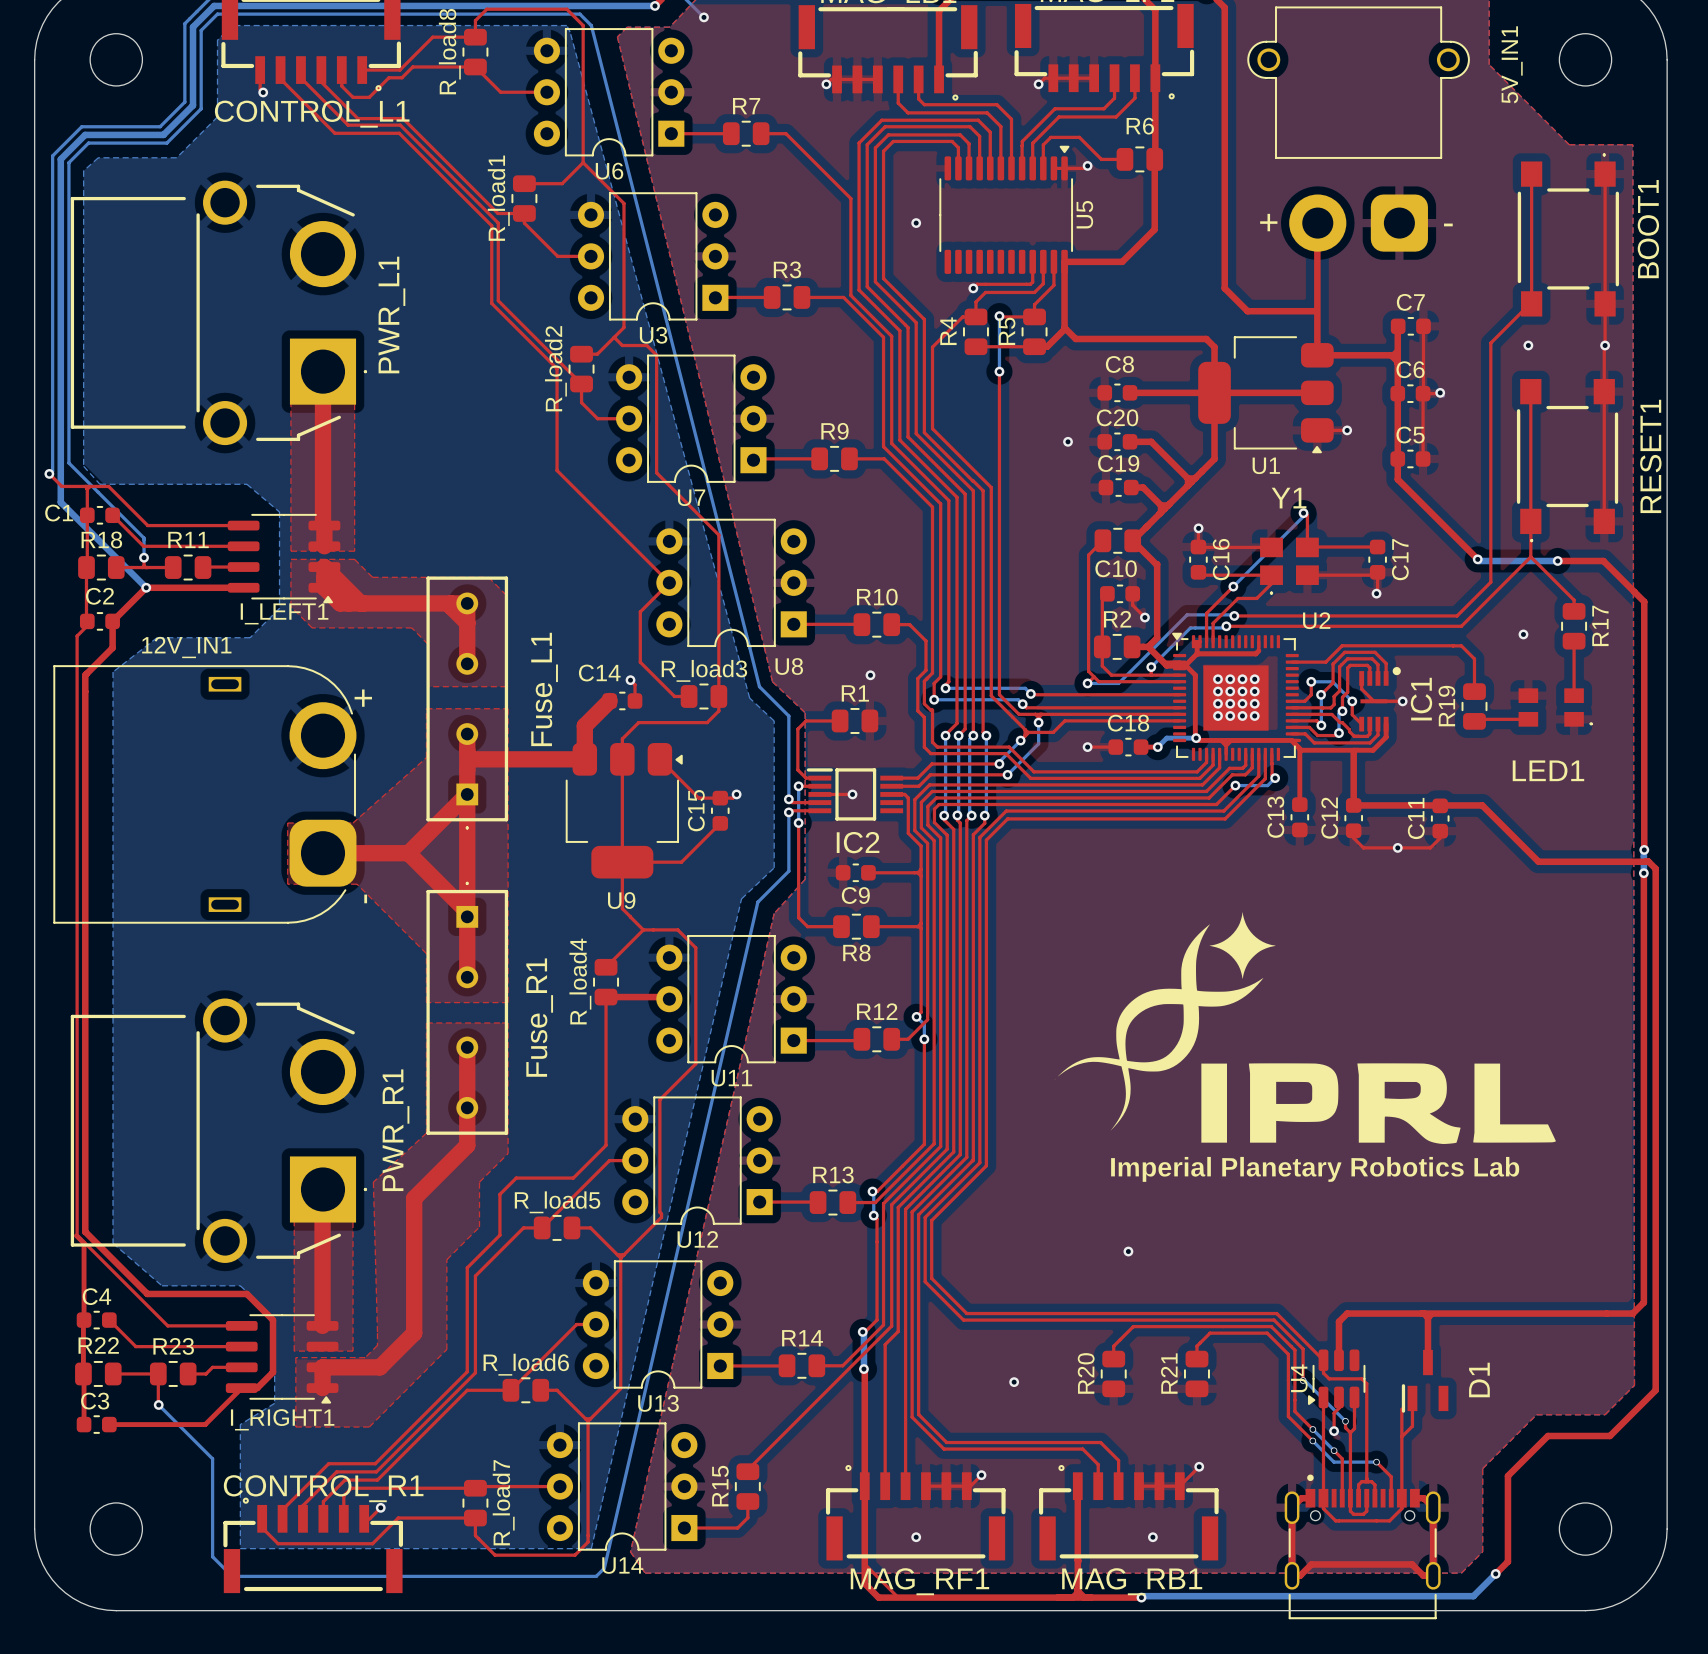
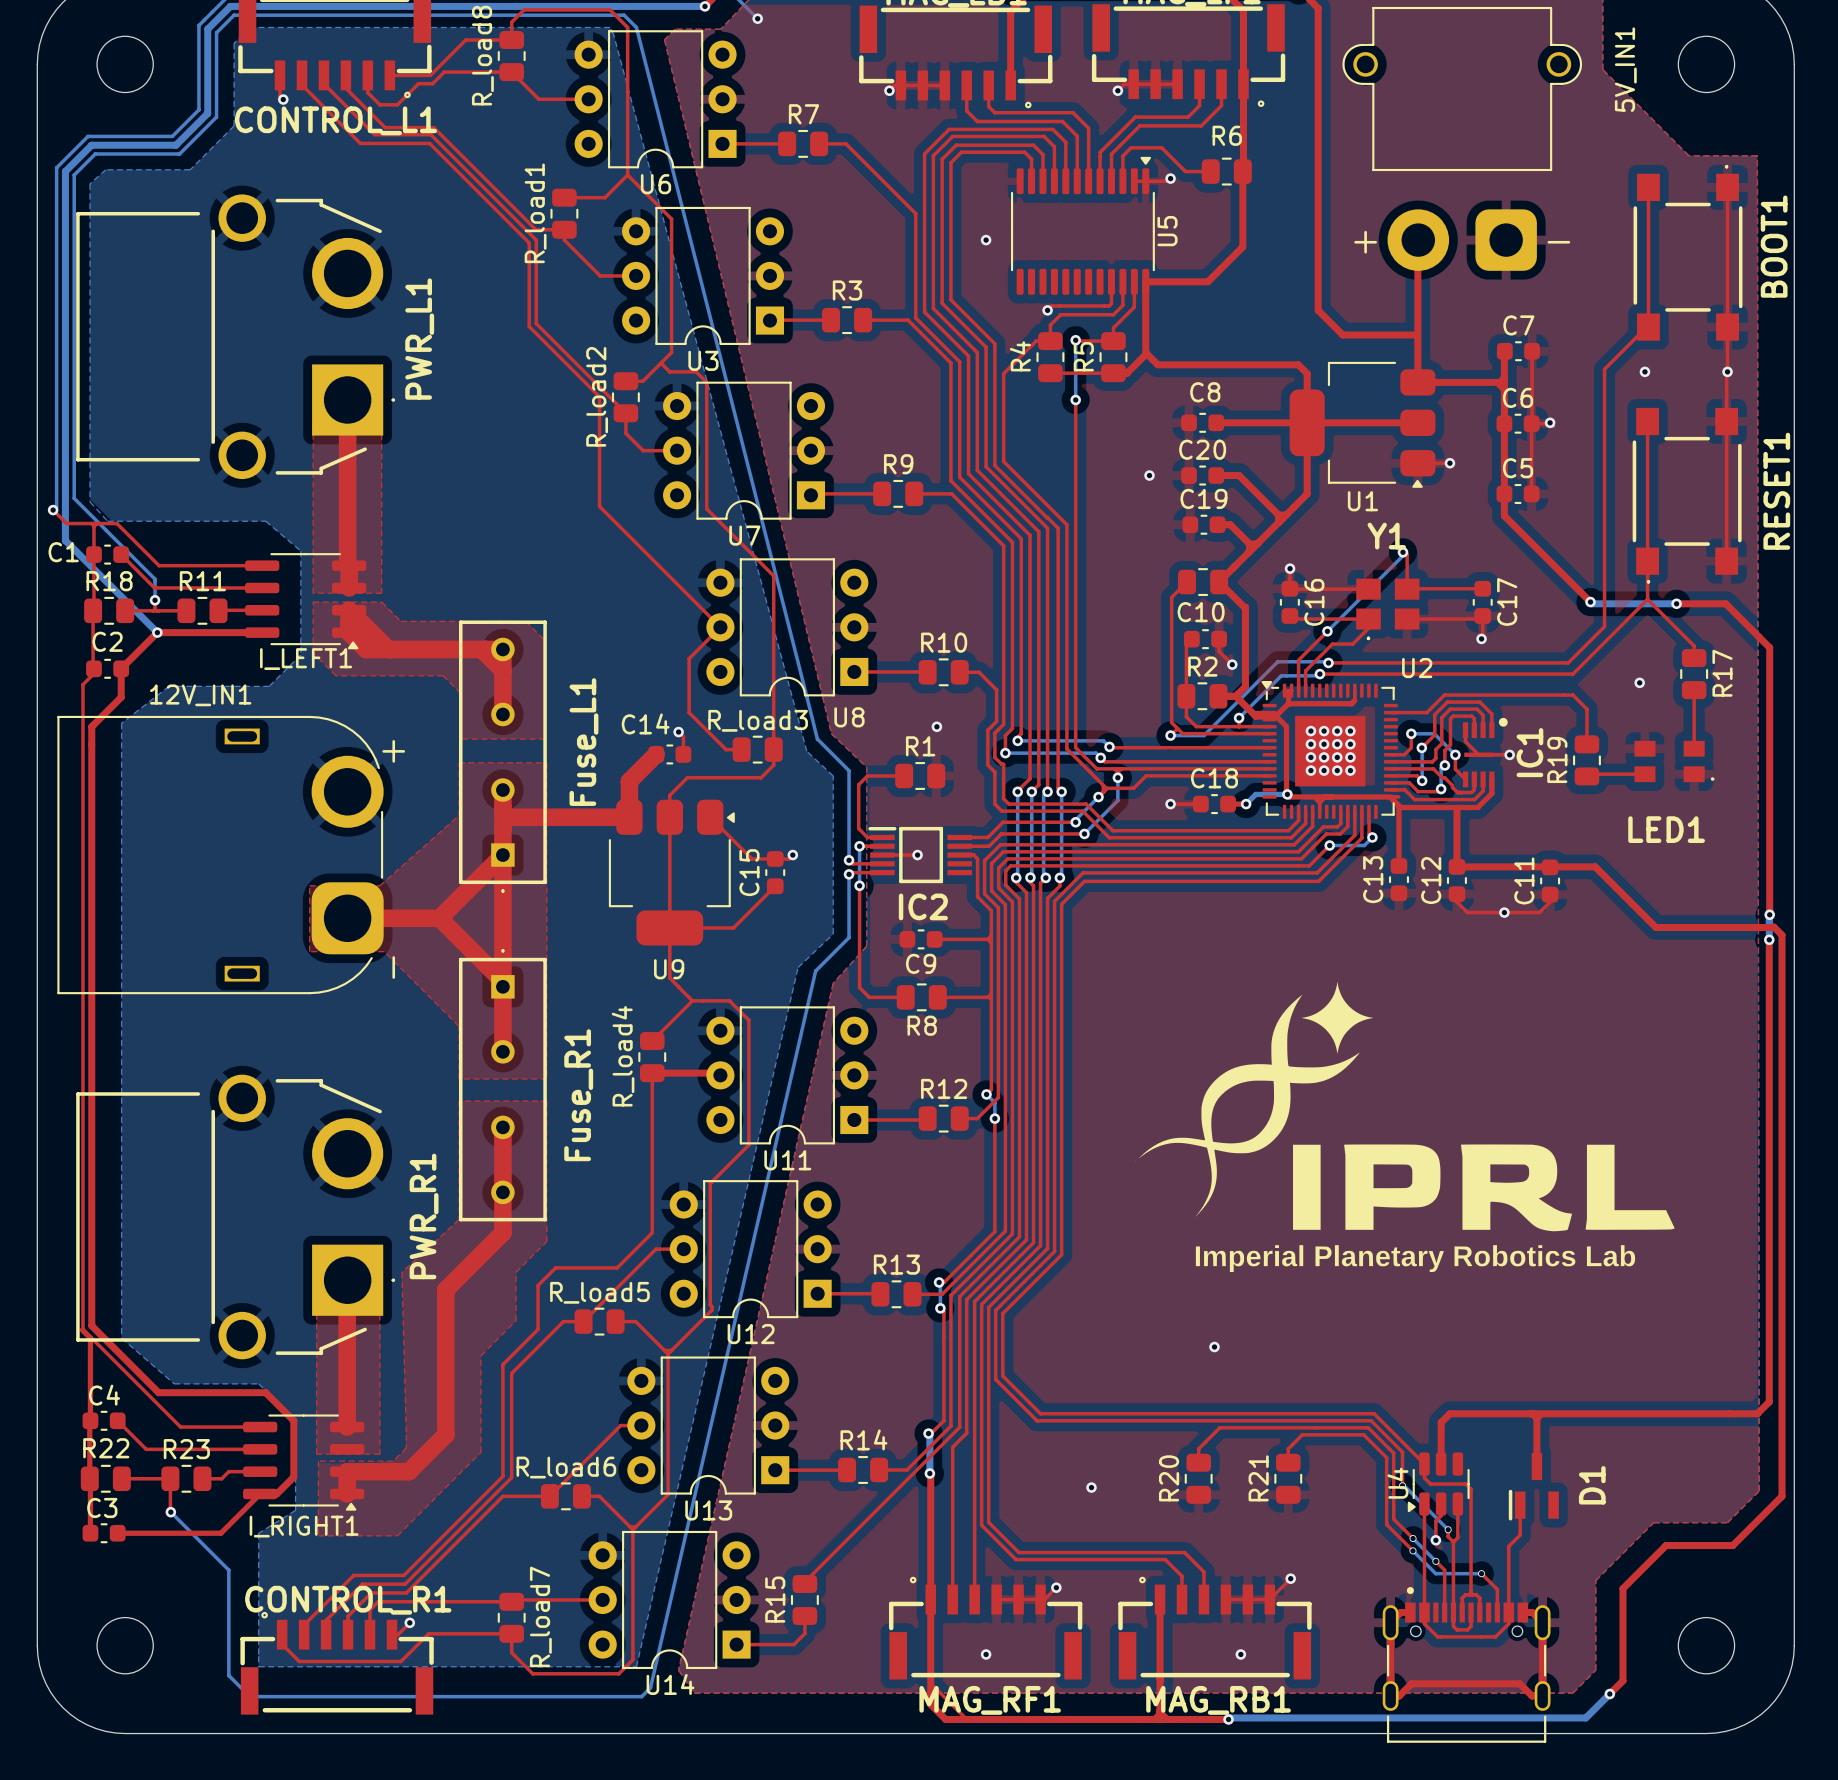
top track: (1401, 1409) (1401, 1436) -> none

